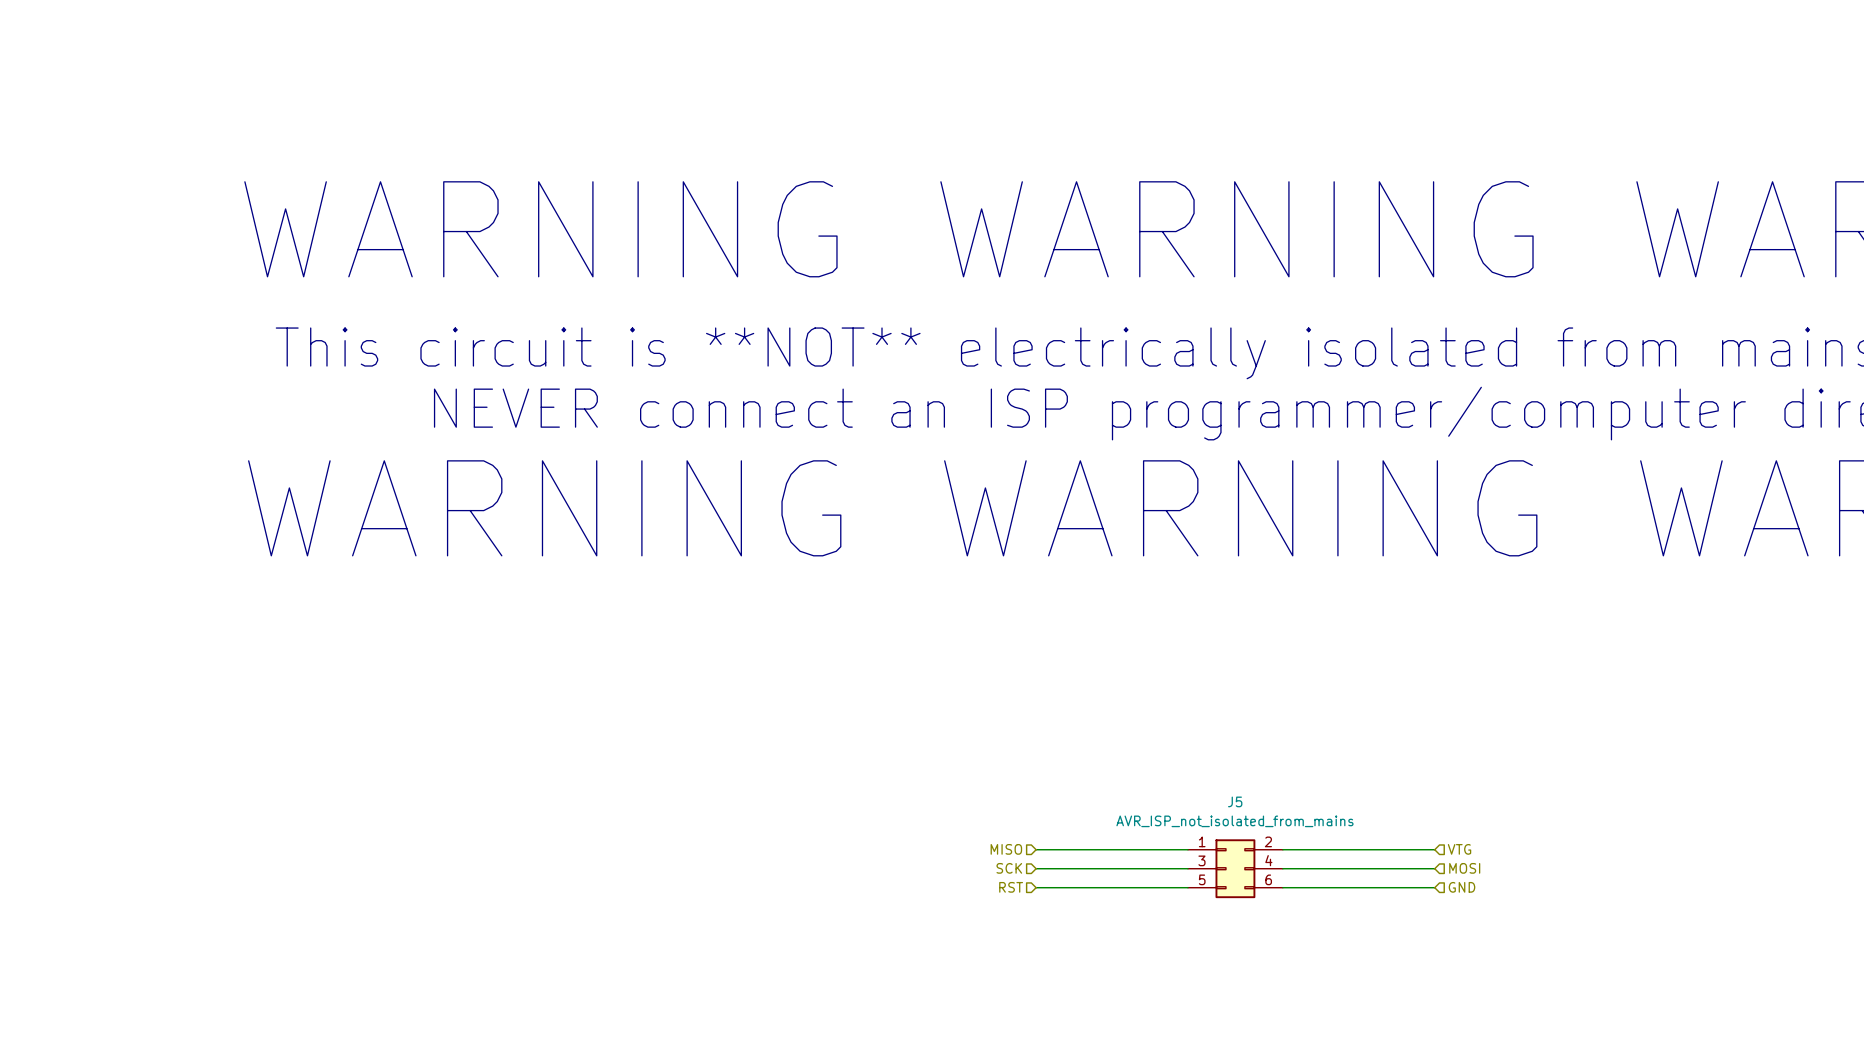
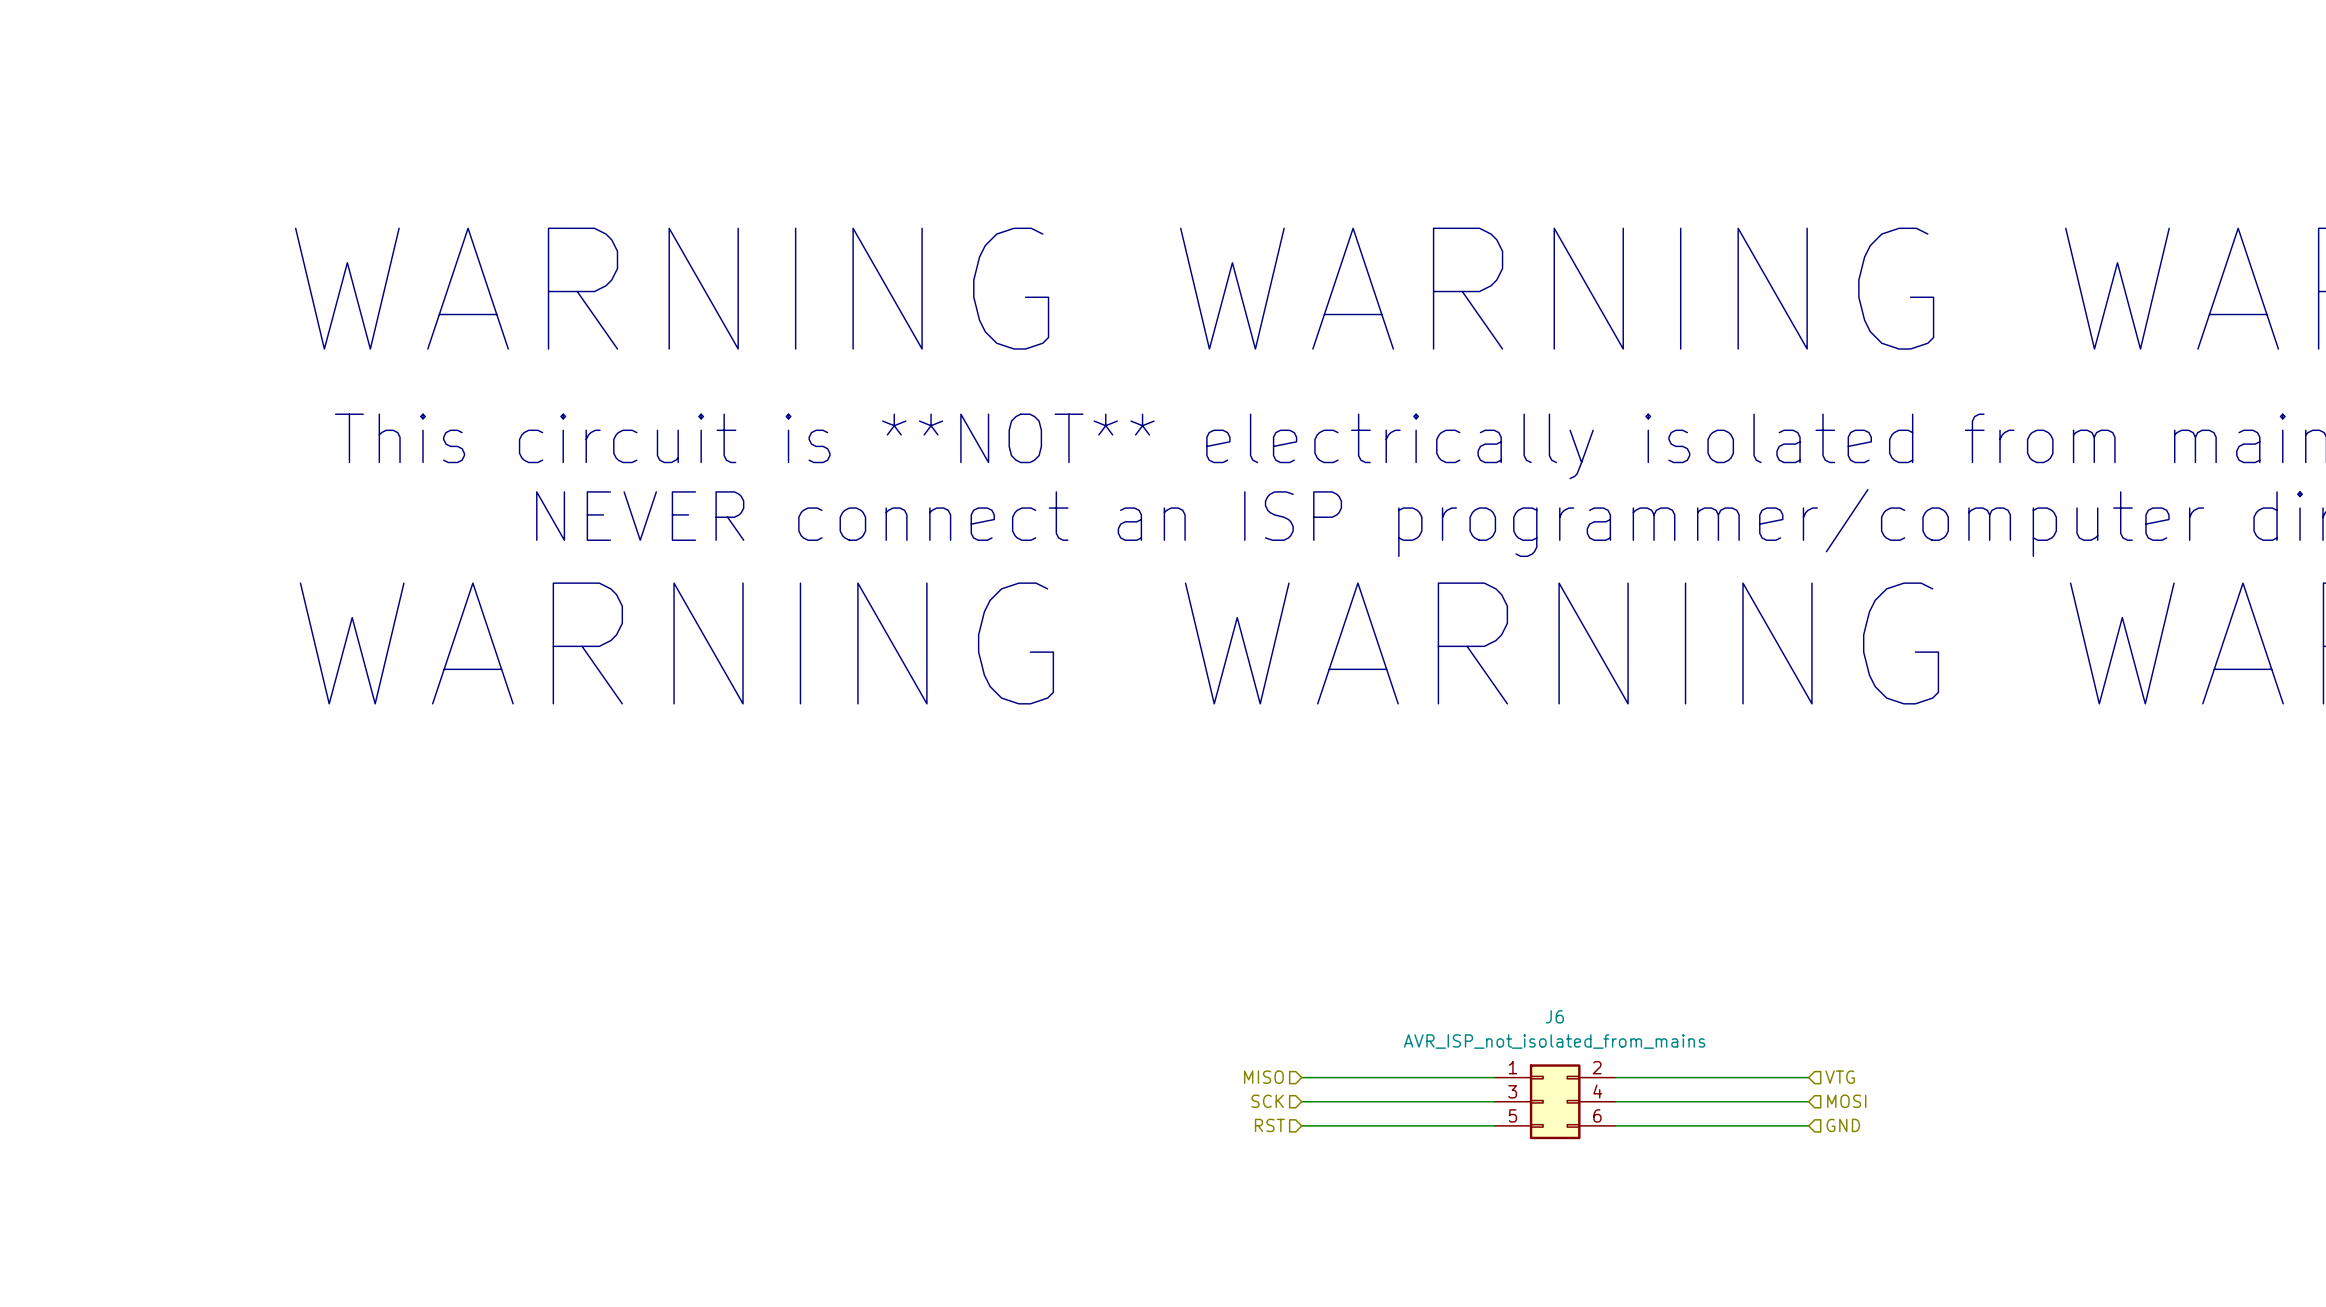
J5 name: J5 (1235, 801) -> J6 (1554, 1016)

